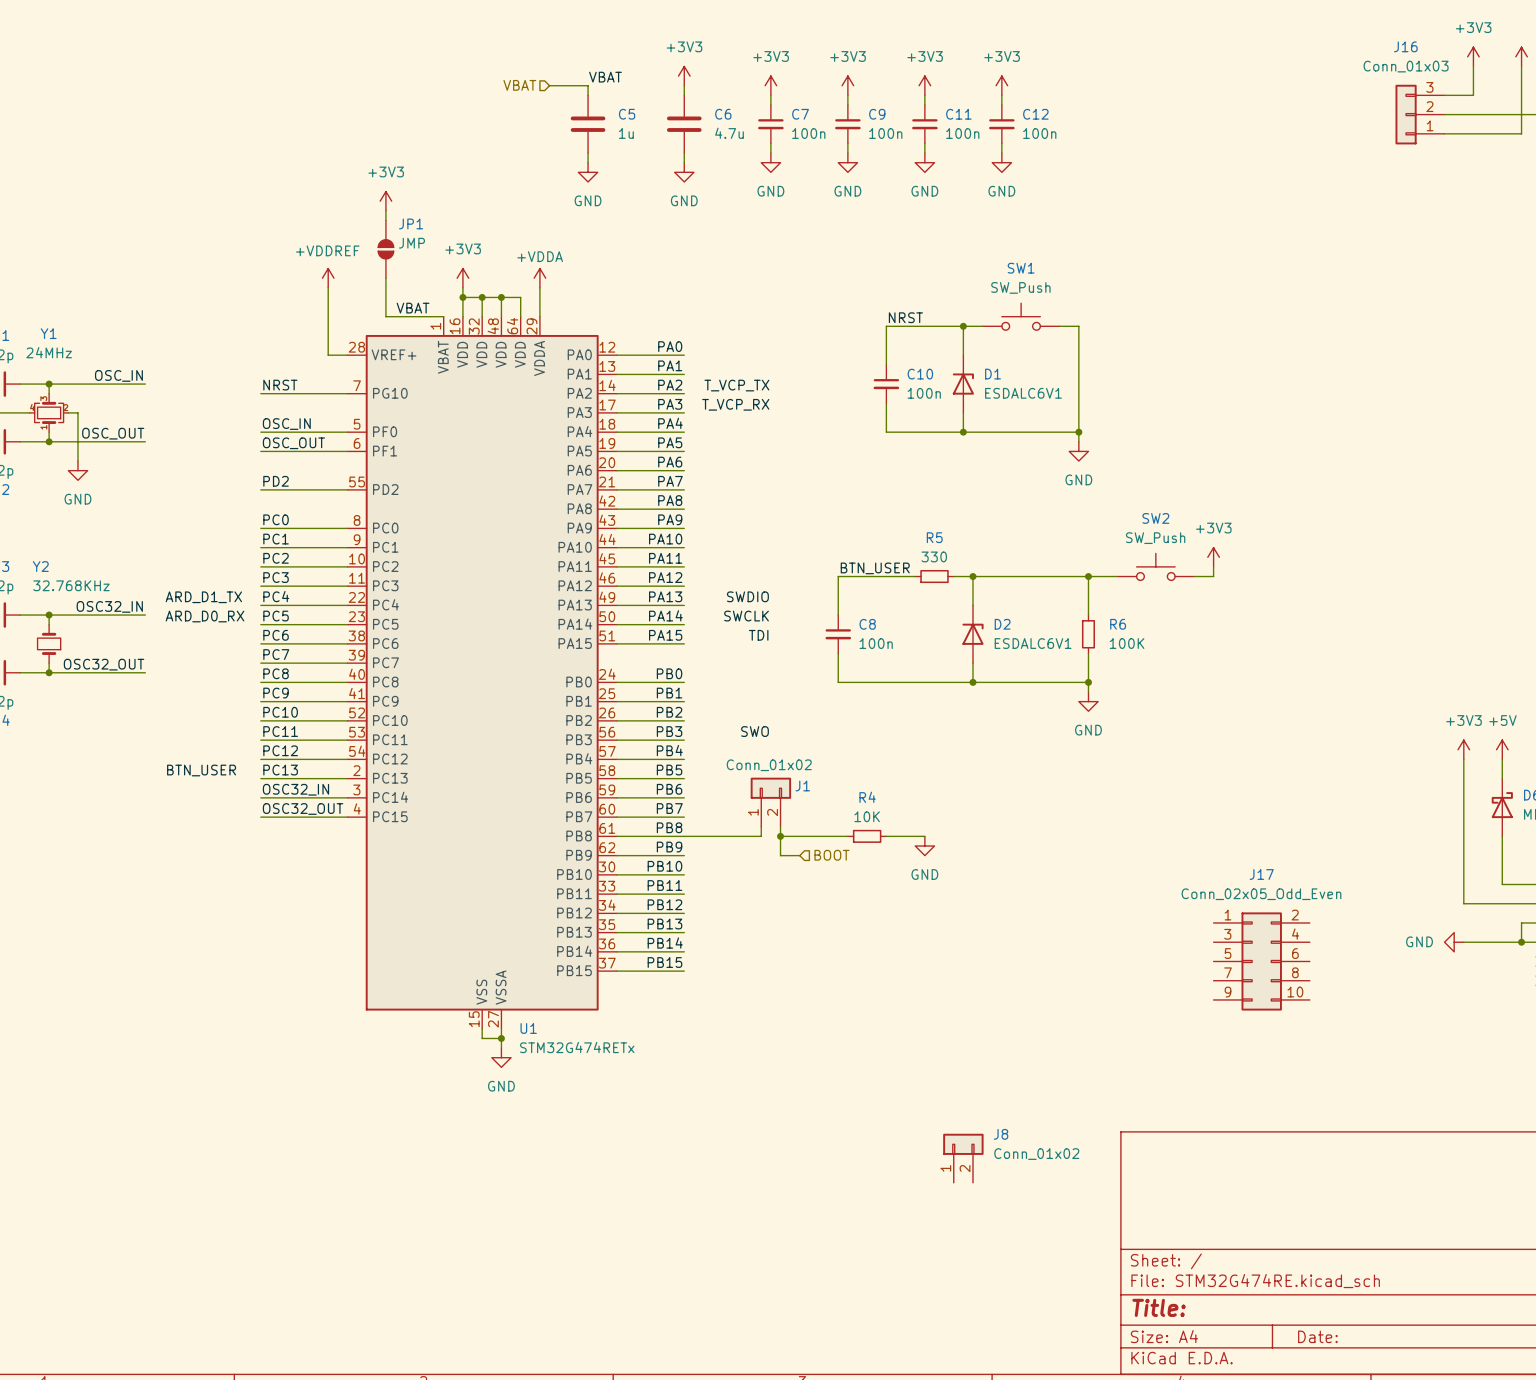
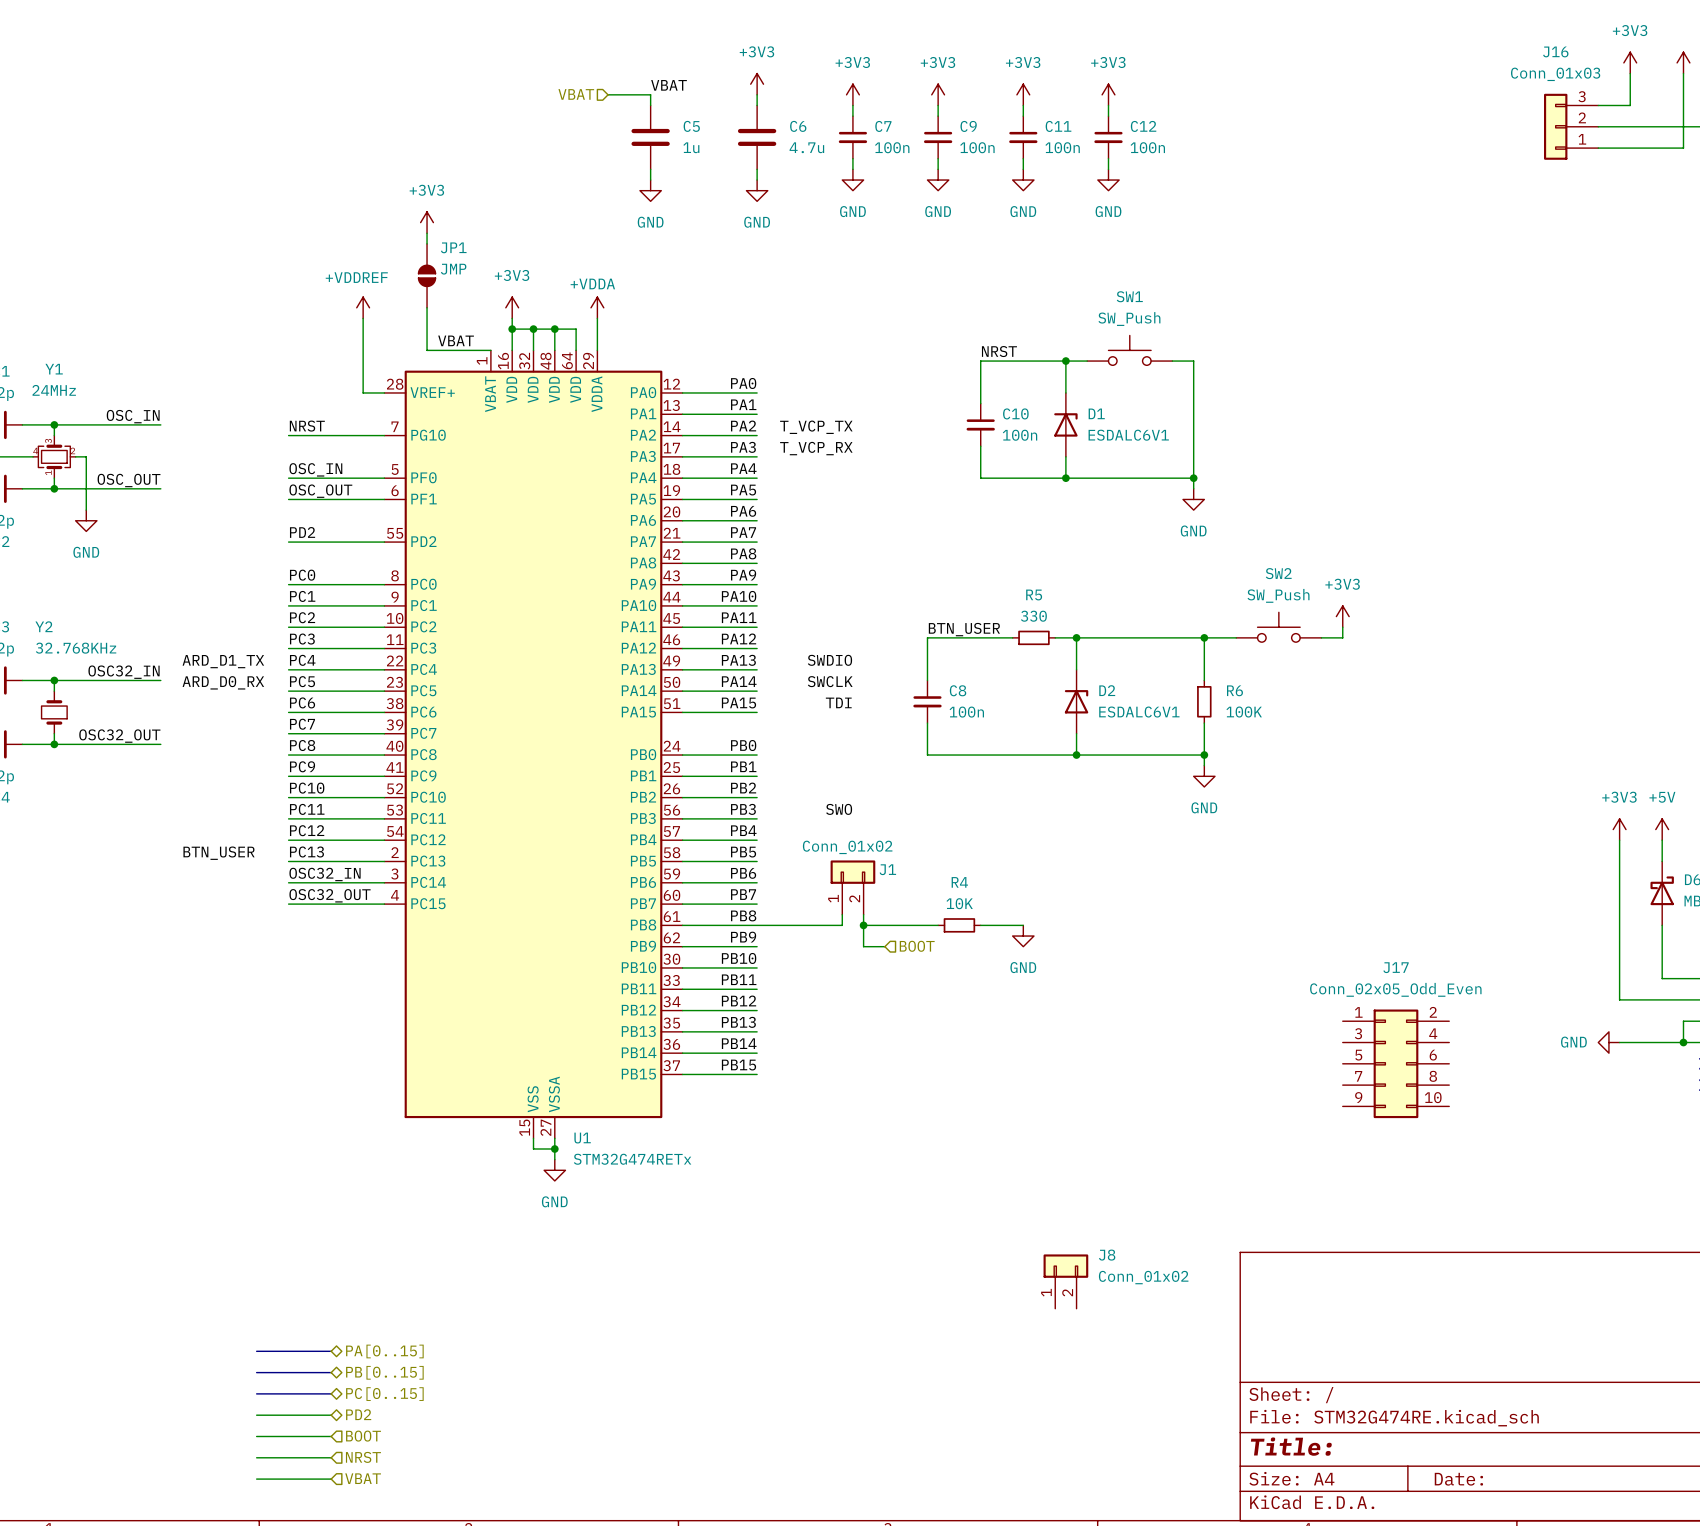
bus: none -> (256, 1351) (331, 1351)
hierarchical label: none -> PA[0..15] (384, 1351)
bus: none -> (256, 1372) (331, 1372)
hierarchical label: none -> PB[0..15] (384, 1372)
bus: none -> (256, 1393) (331, 1393)
hierarchical label: none -> PC[0..15] (384, 1394)
hierarchical label: none -> PD2 (358, 1414)
wire: none -> (256, 1415) (331, 1415)
hierarchical label: none -> BOOT (363, 1436)
wire: none -> (256, 1436) (331, 1436)
wire: none -> (256, 1457) (331, 1457)
hierarchical label: none -> NRST (363, 1457)
wire: none -> (256, 1479) (331, 1479)
hierarchical label: none -> VBAT (363, 1478)

